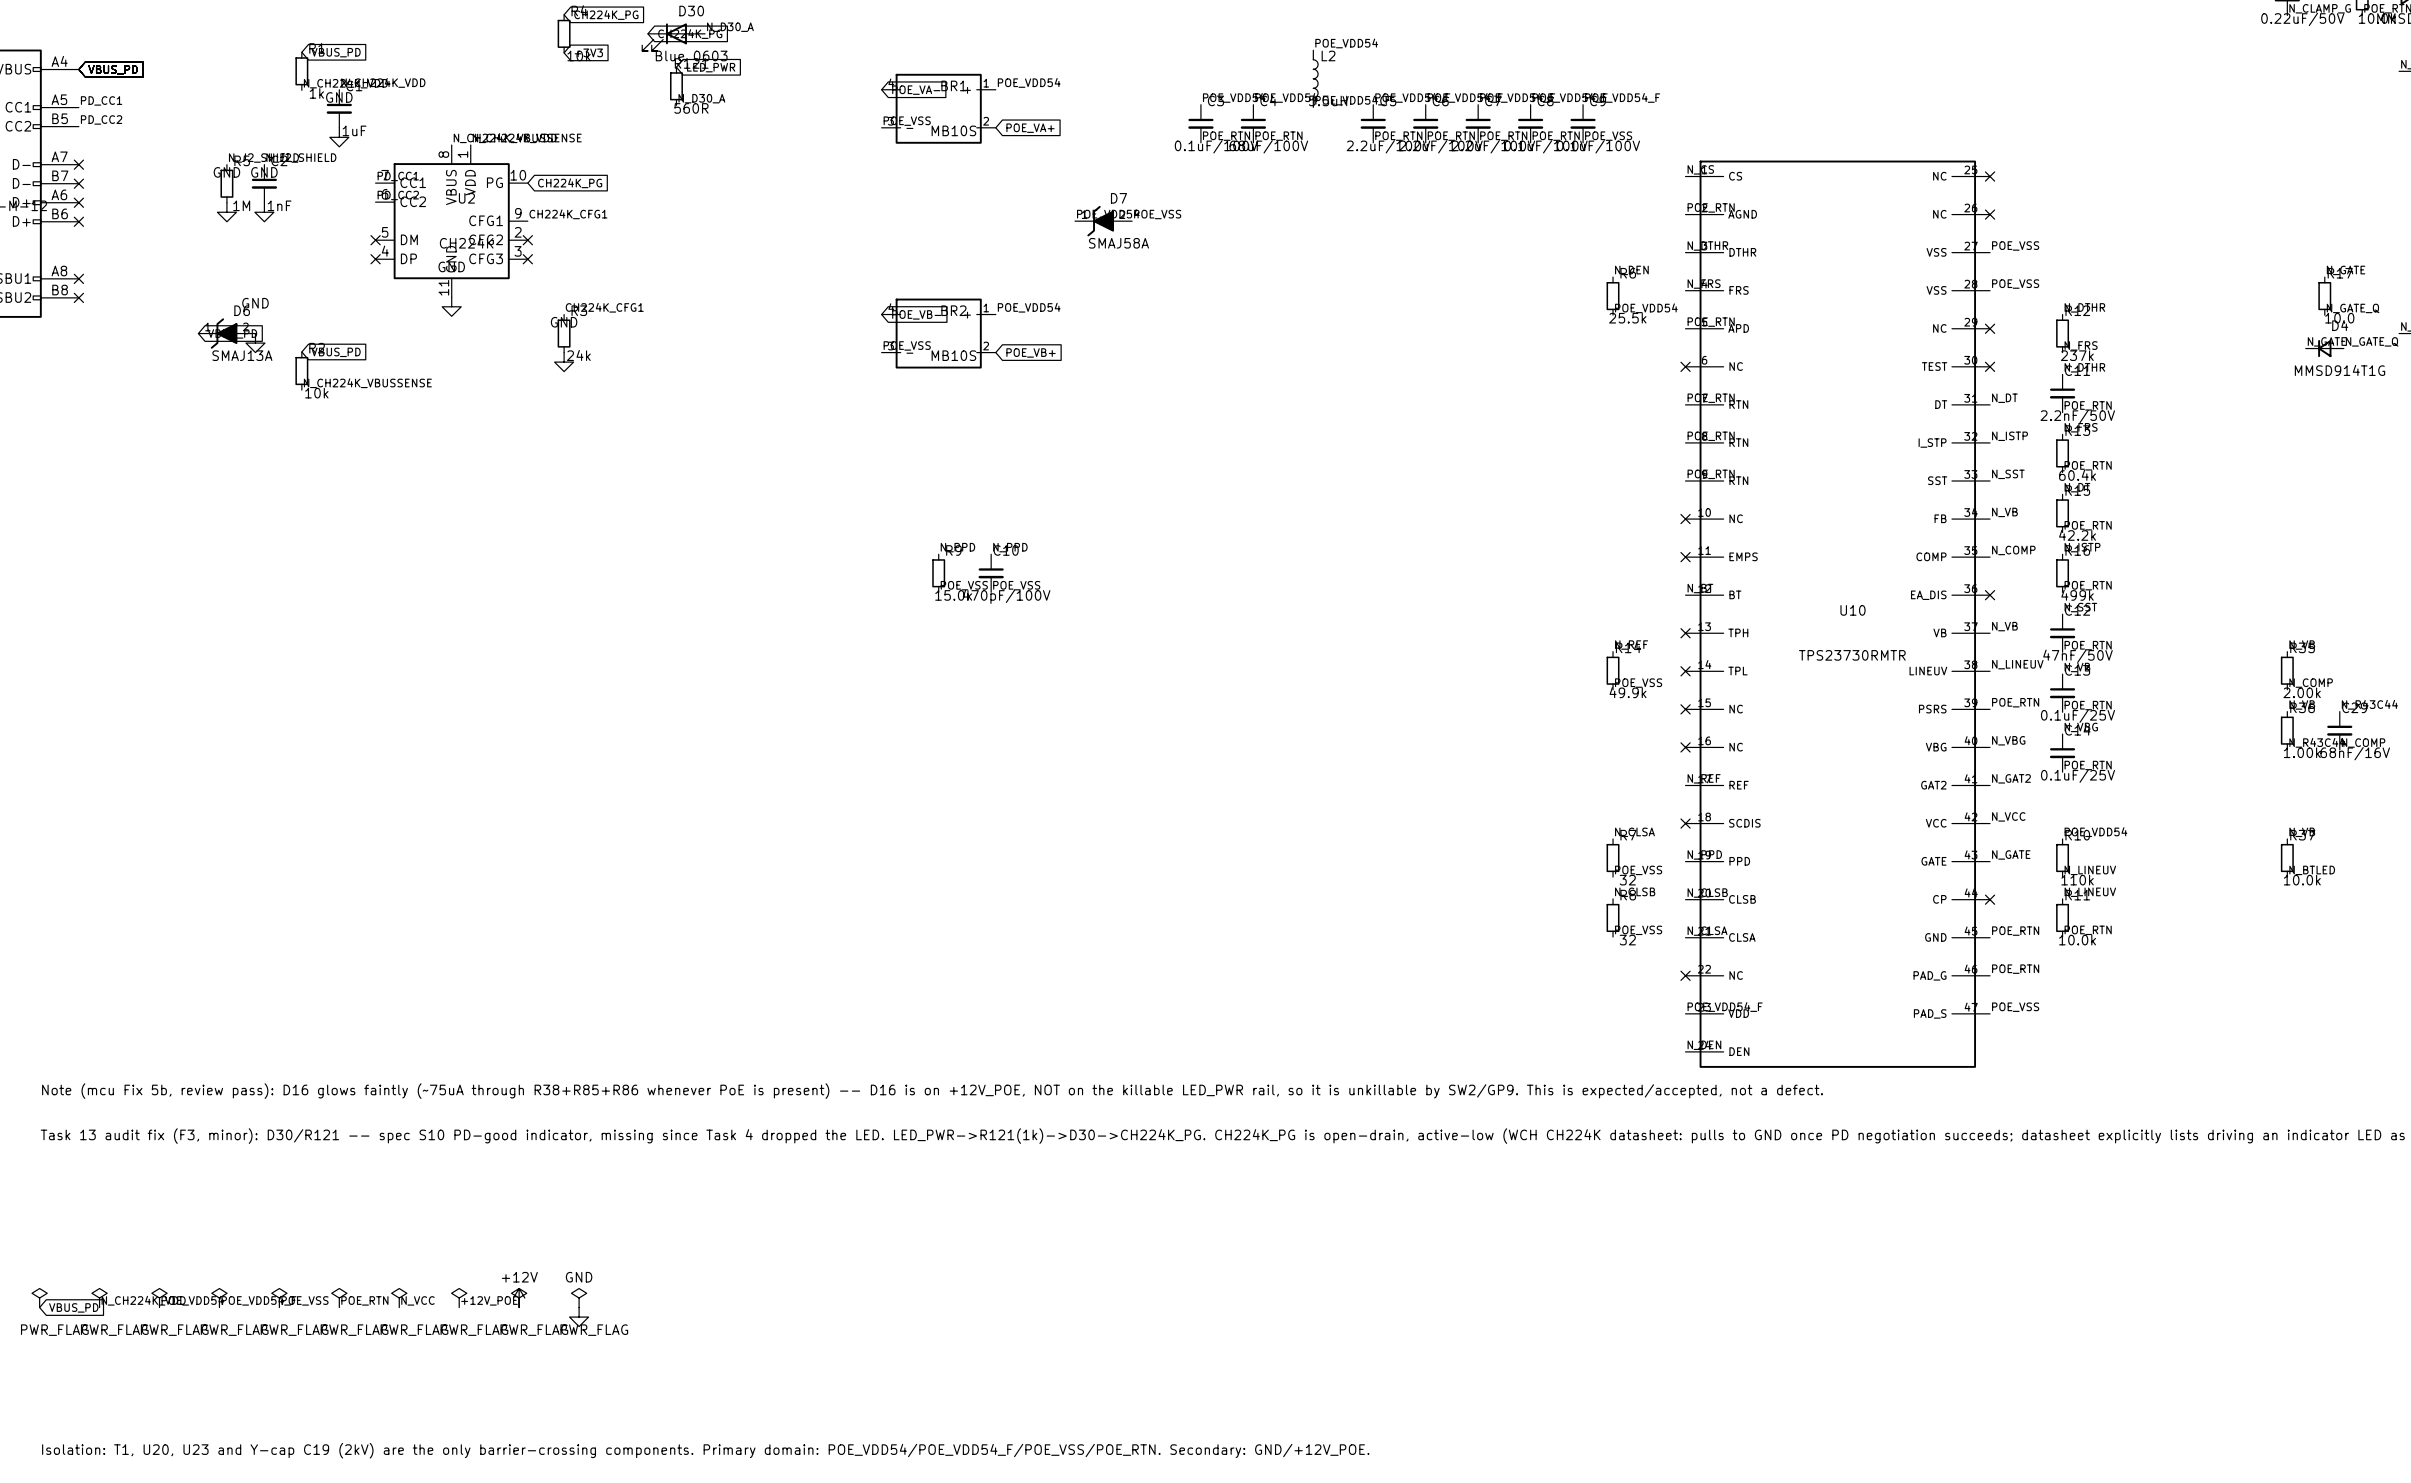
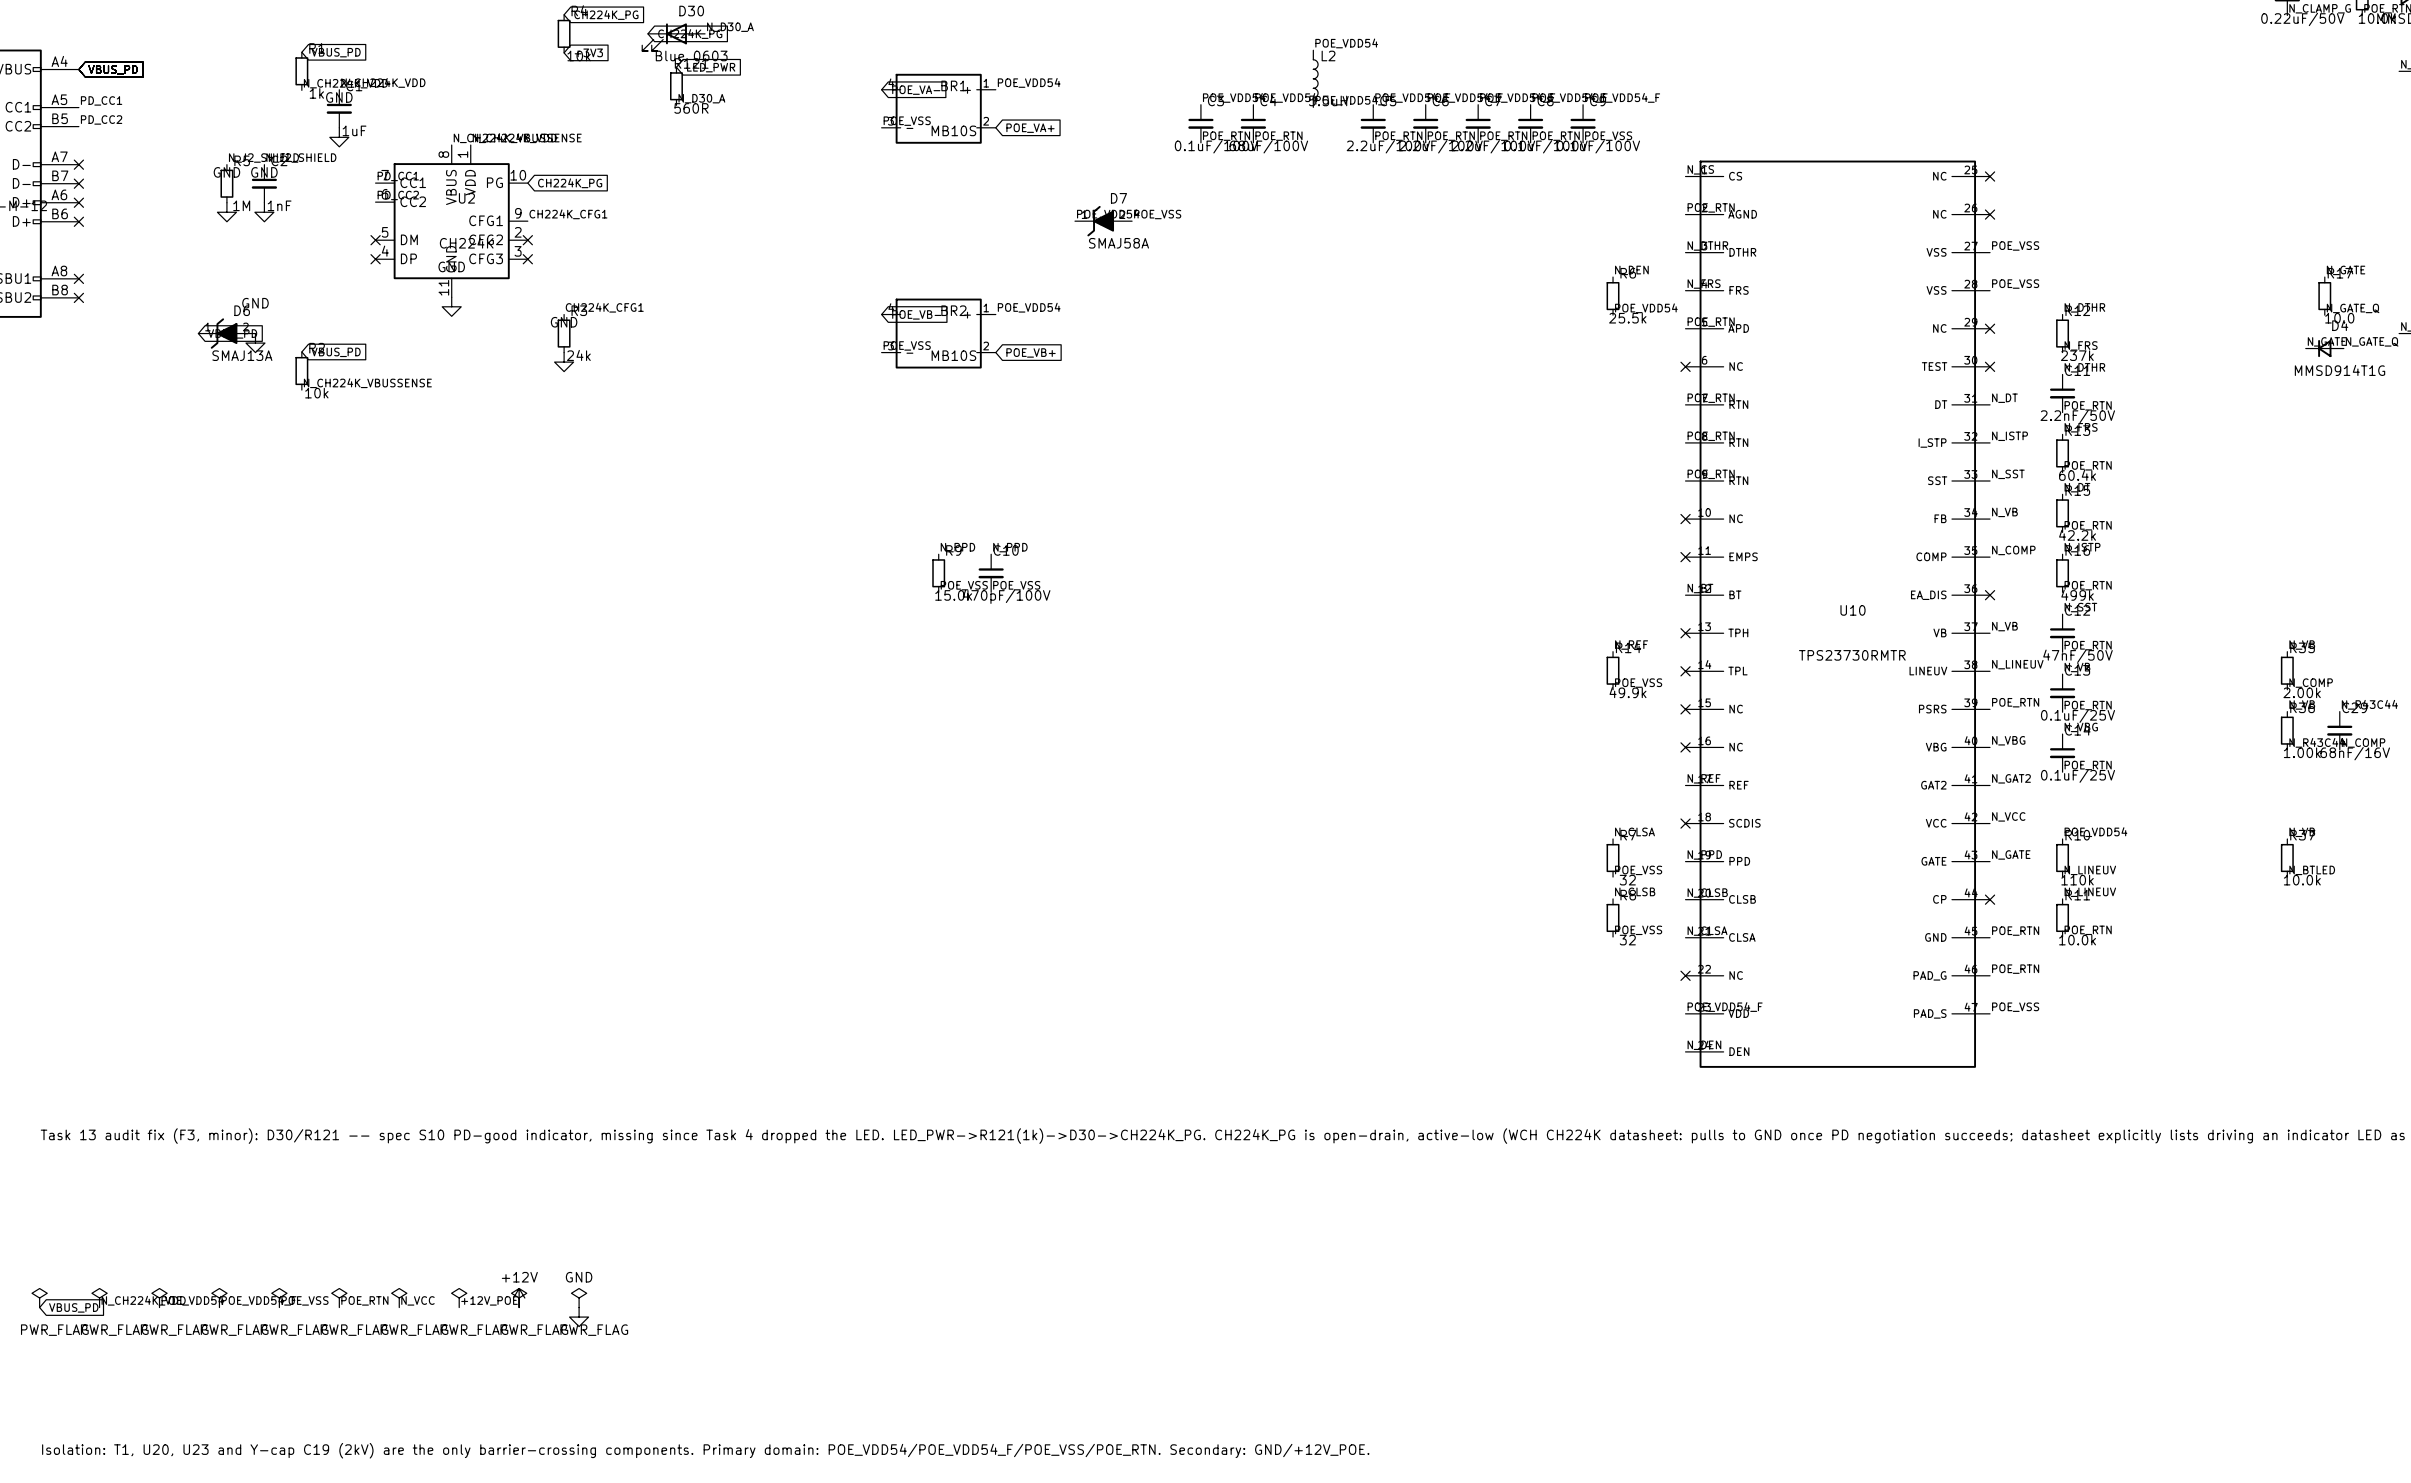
text: Note (mcu Fix 5b, review pass): D16 glows faintly (~75uA through R38+R85+R86 whenever PoE is present) -- D16 is on +12V_POE, NOT on the killable LED_PWR rail, so it is unkillable by SW2/GP9. This is expected/accepted, not a defect. (932, 1091) -> none

